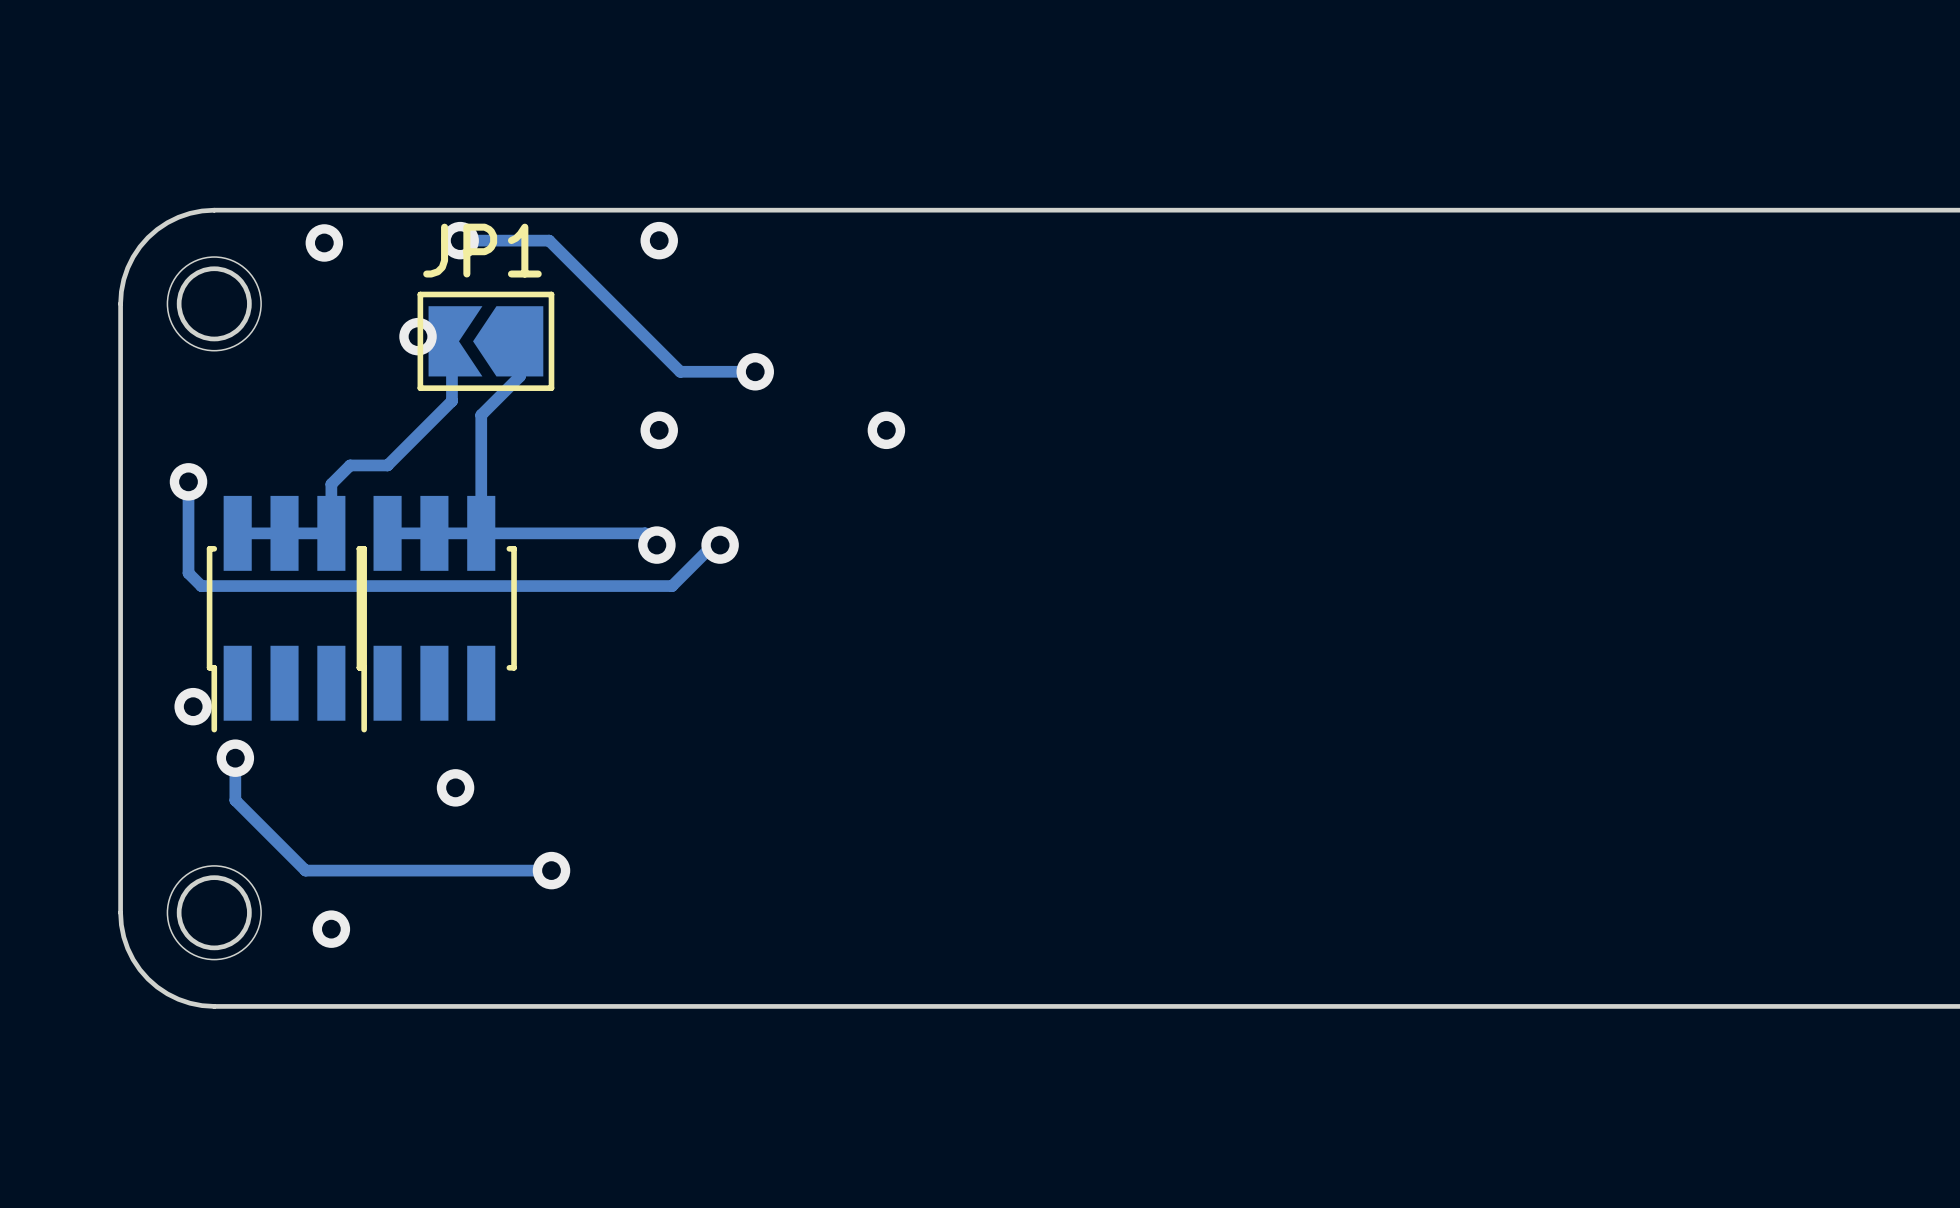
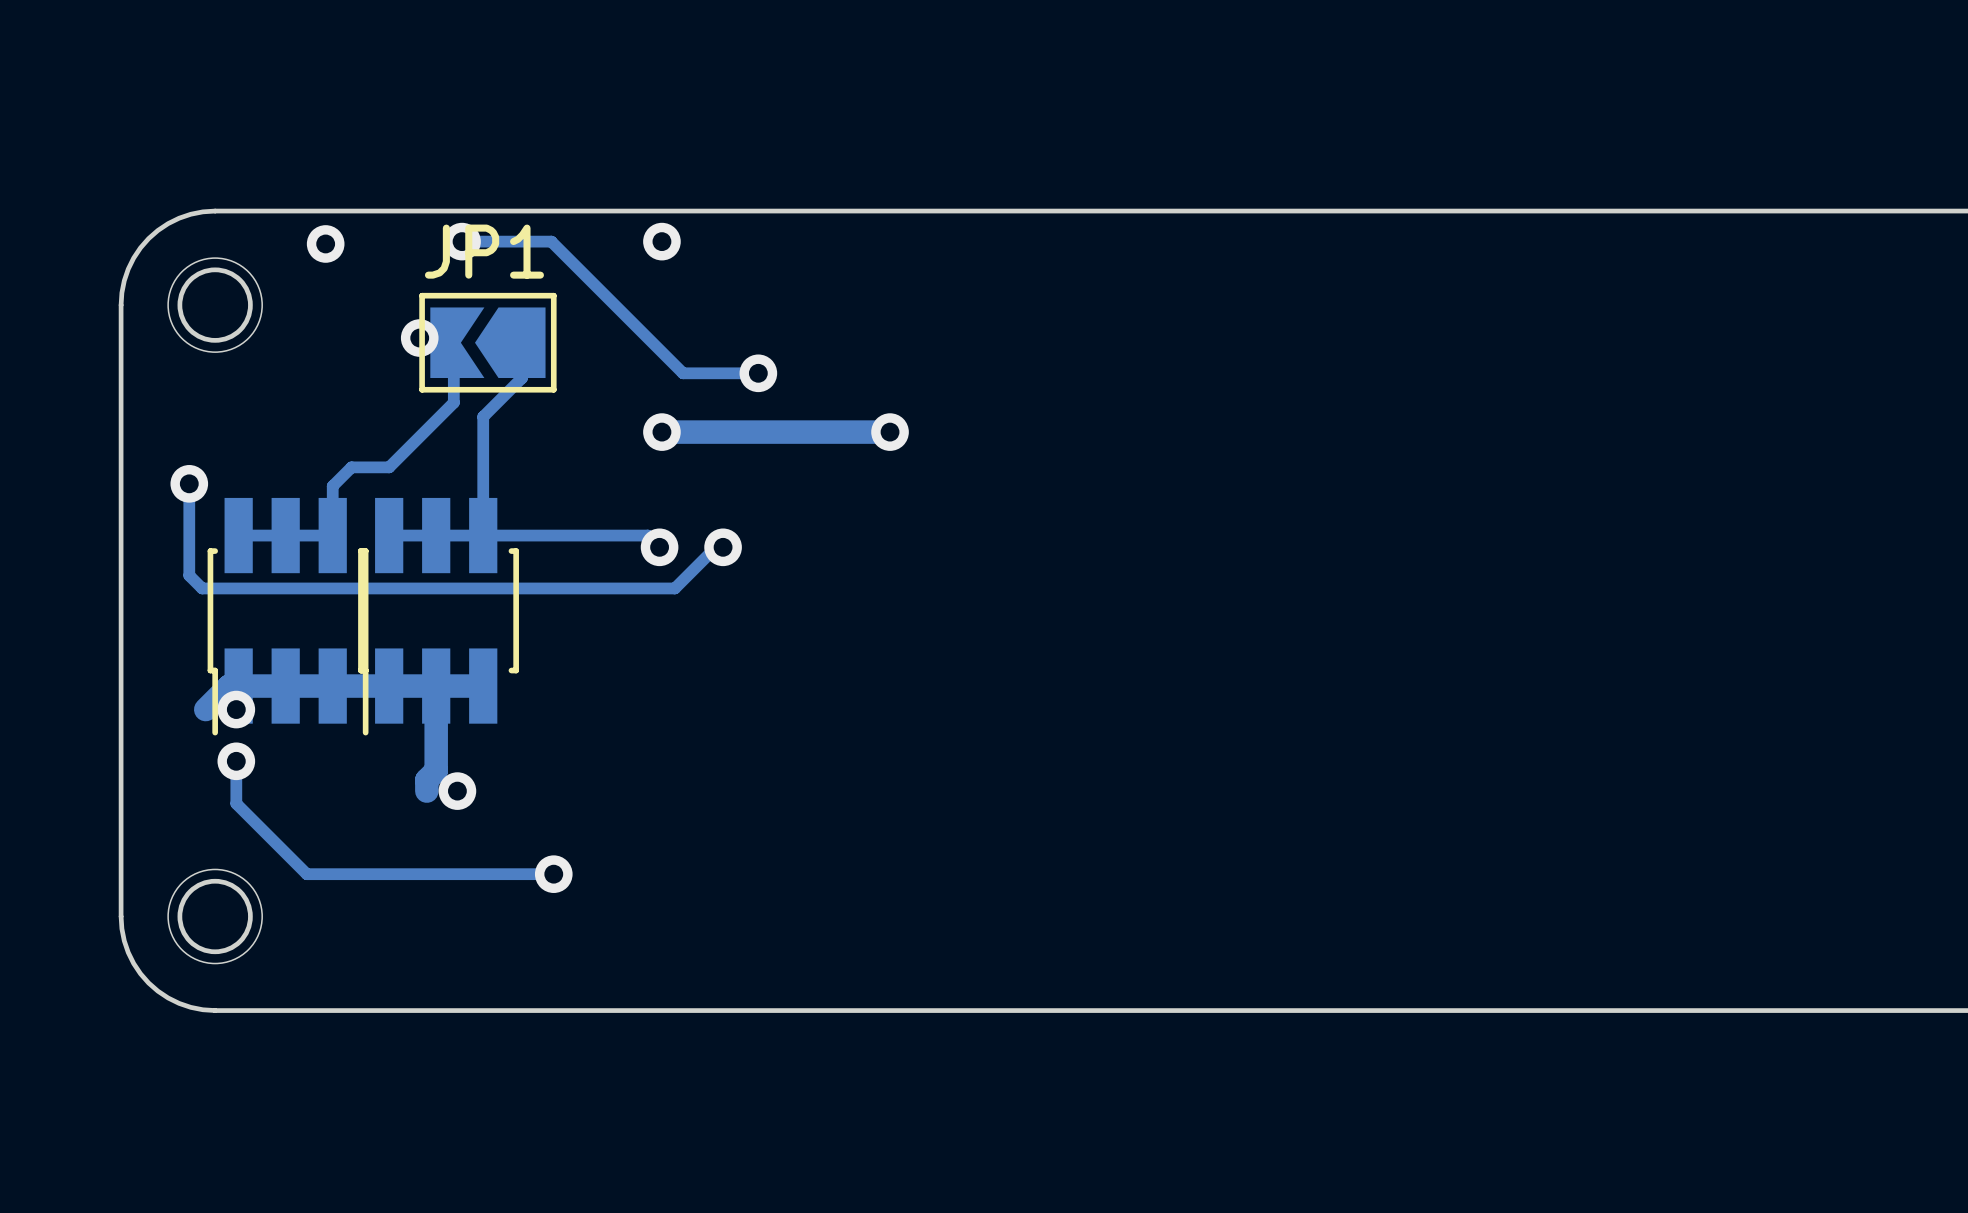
track: none -> (890, 432) (661, 432)
track: none -> (436, 686) (436, 770) (426, 780) (426, 791)
track: none -> (483, 686) (229, 686) (205, 709)
via position: (193, 706) -> (236, 709)
via: (331, 929) -> none

